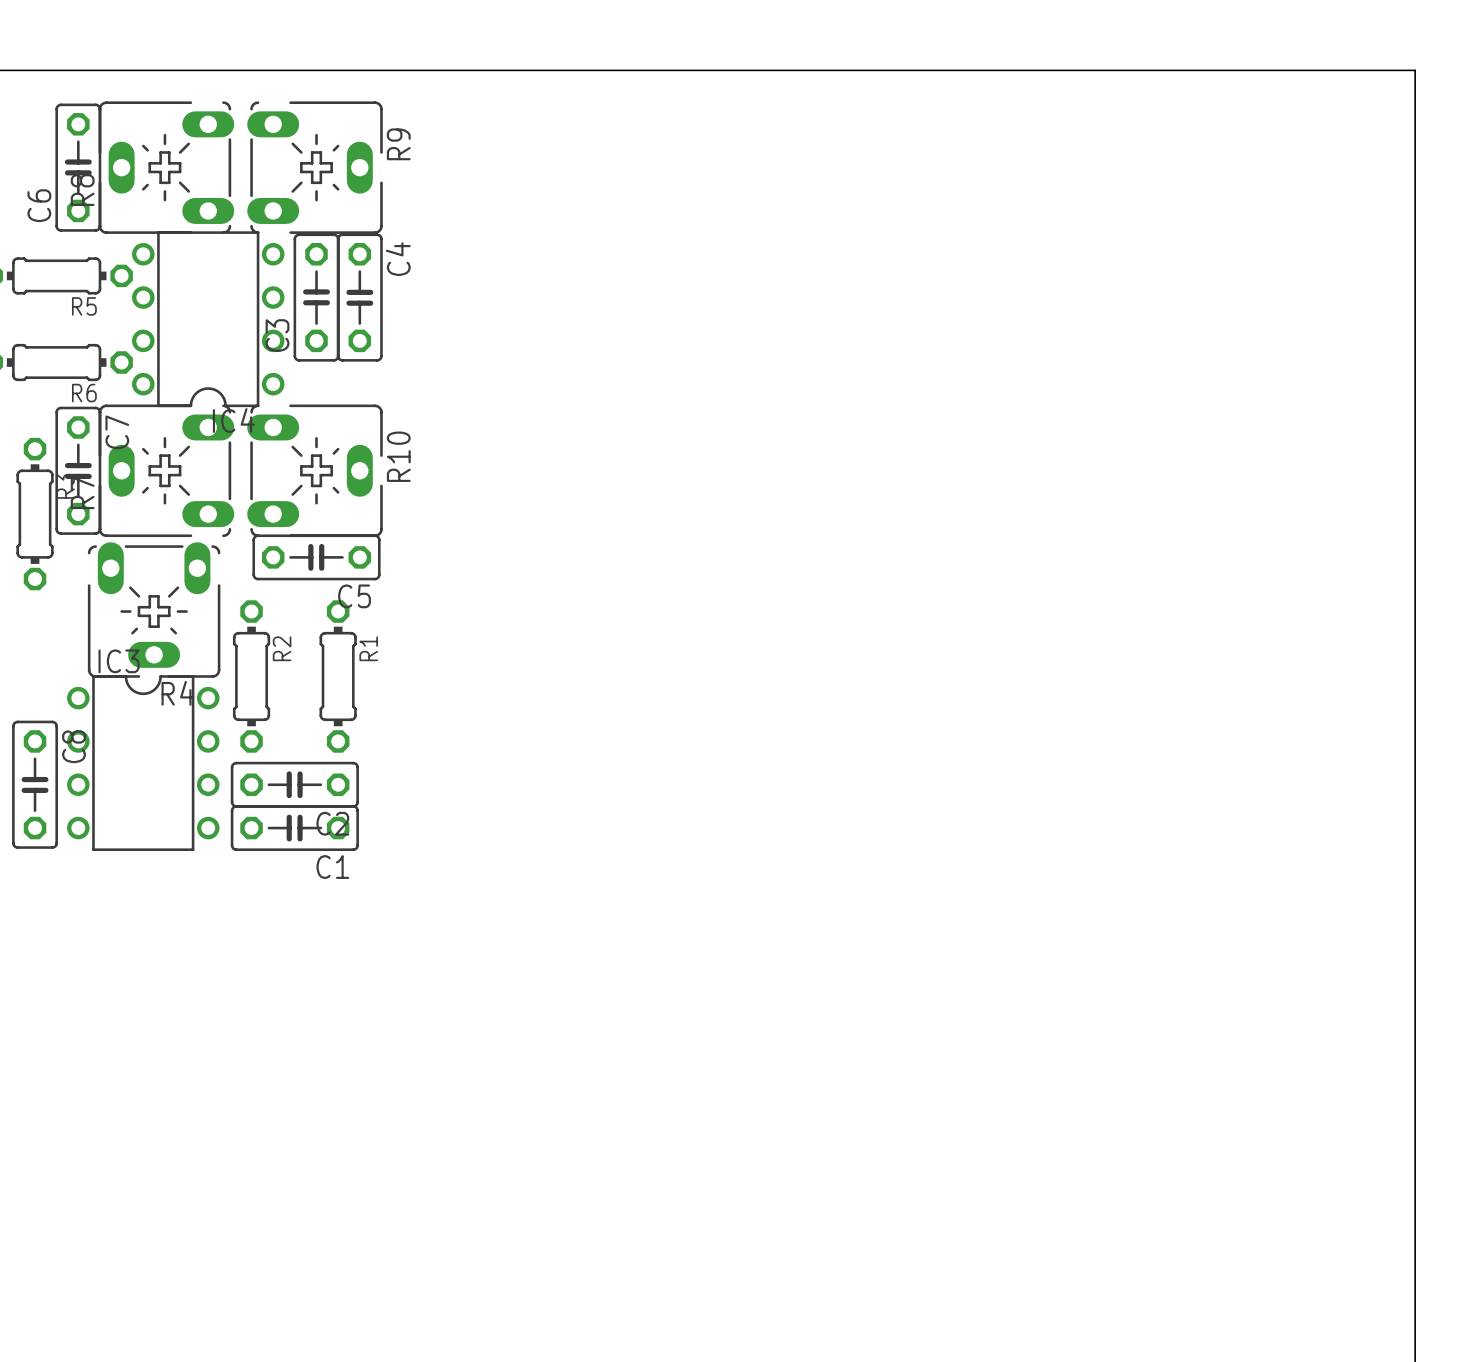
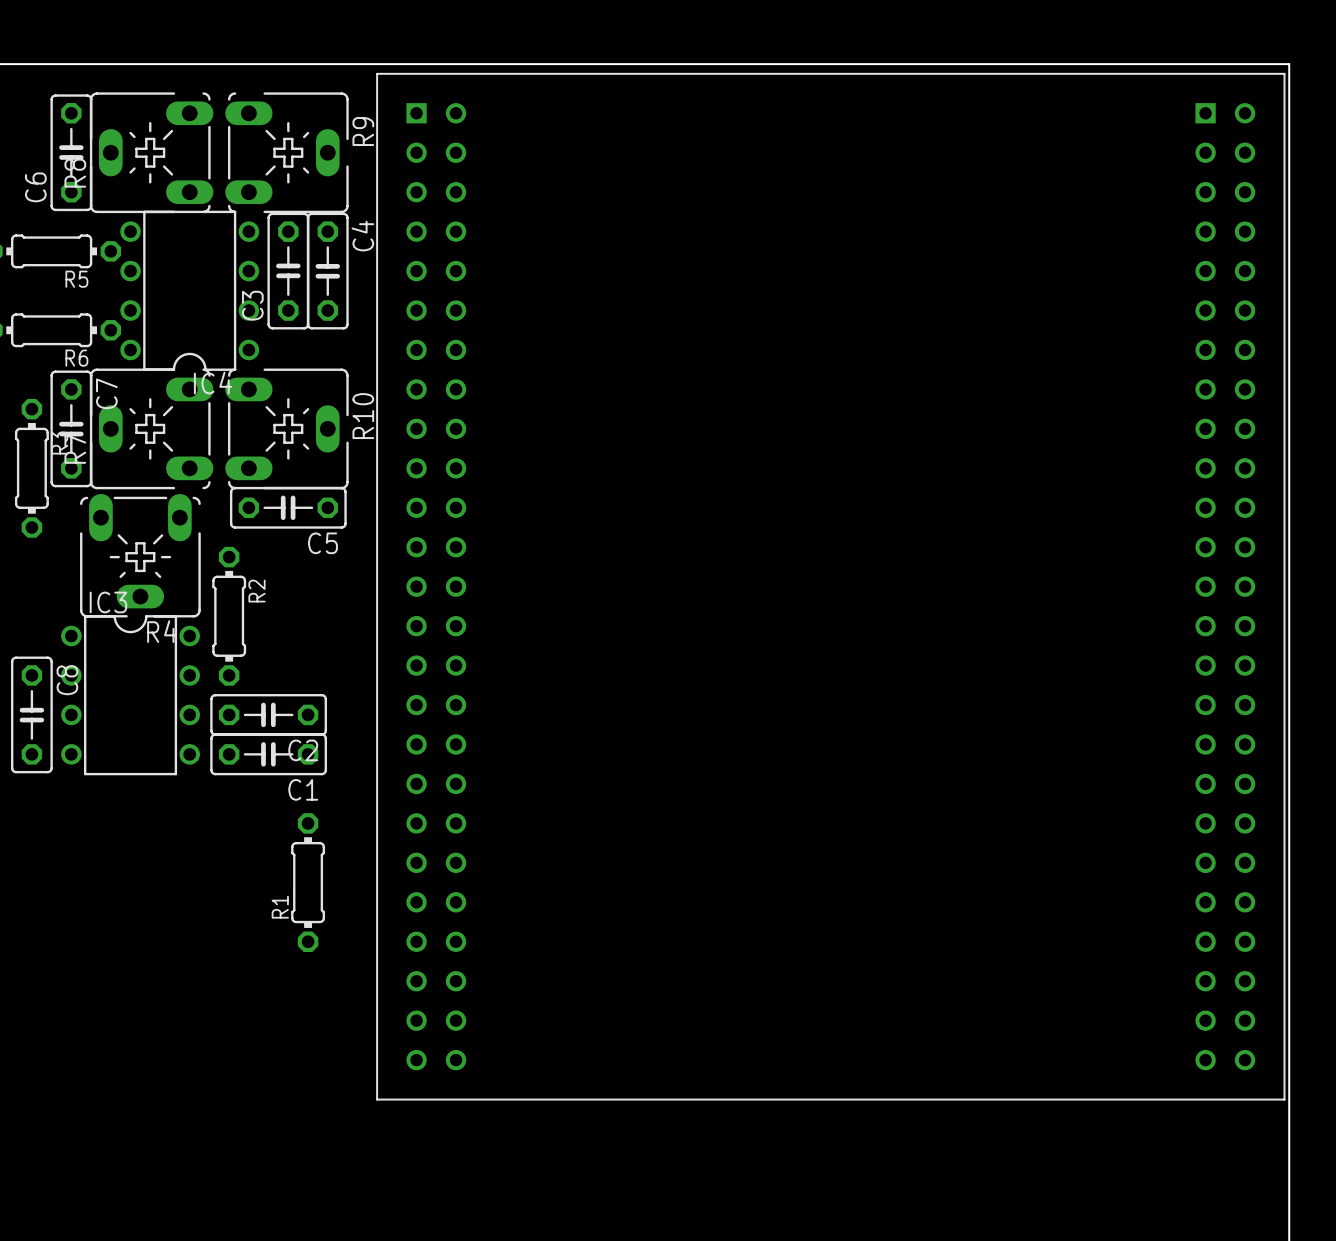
part: none -> (830, 586)
R1 name position: R1 (368, 648) -> R1 (280, 907)
R1 position: (338, 676) -> (308, 882)

